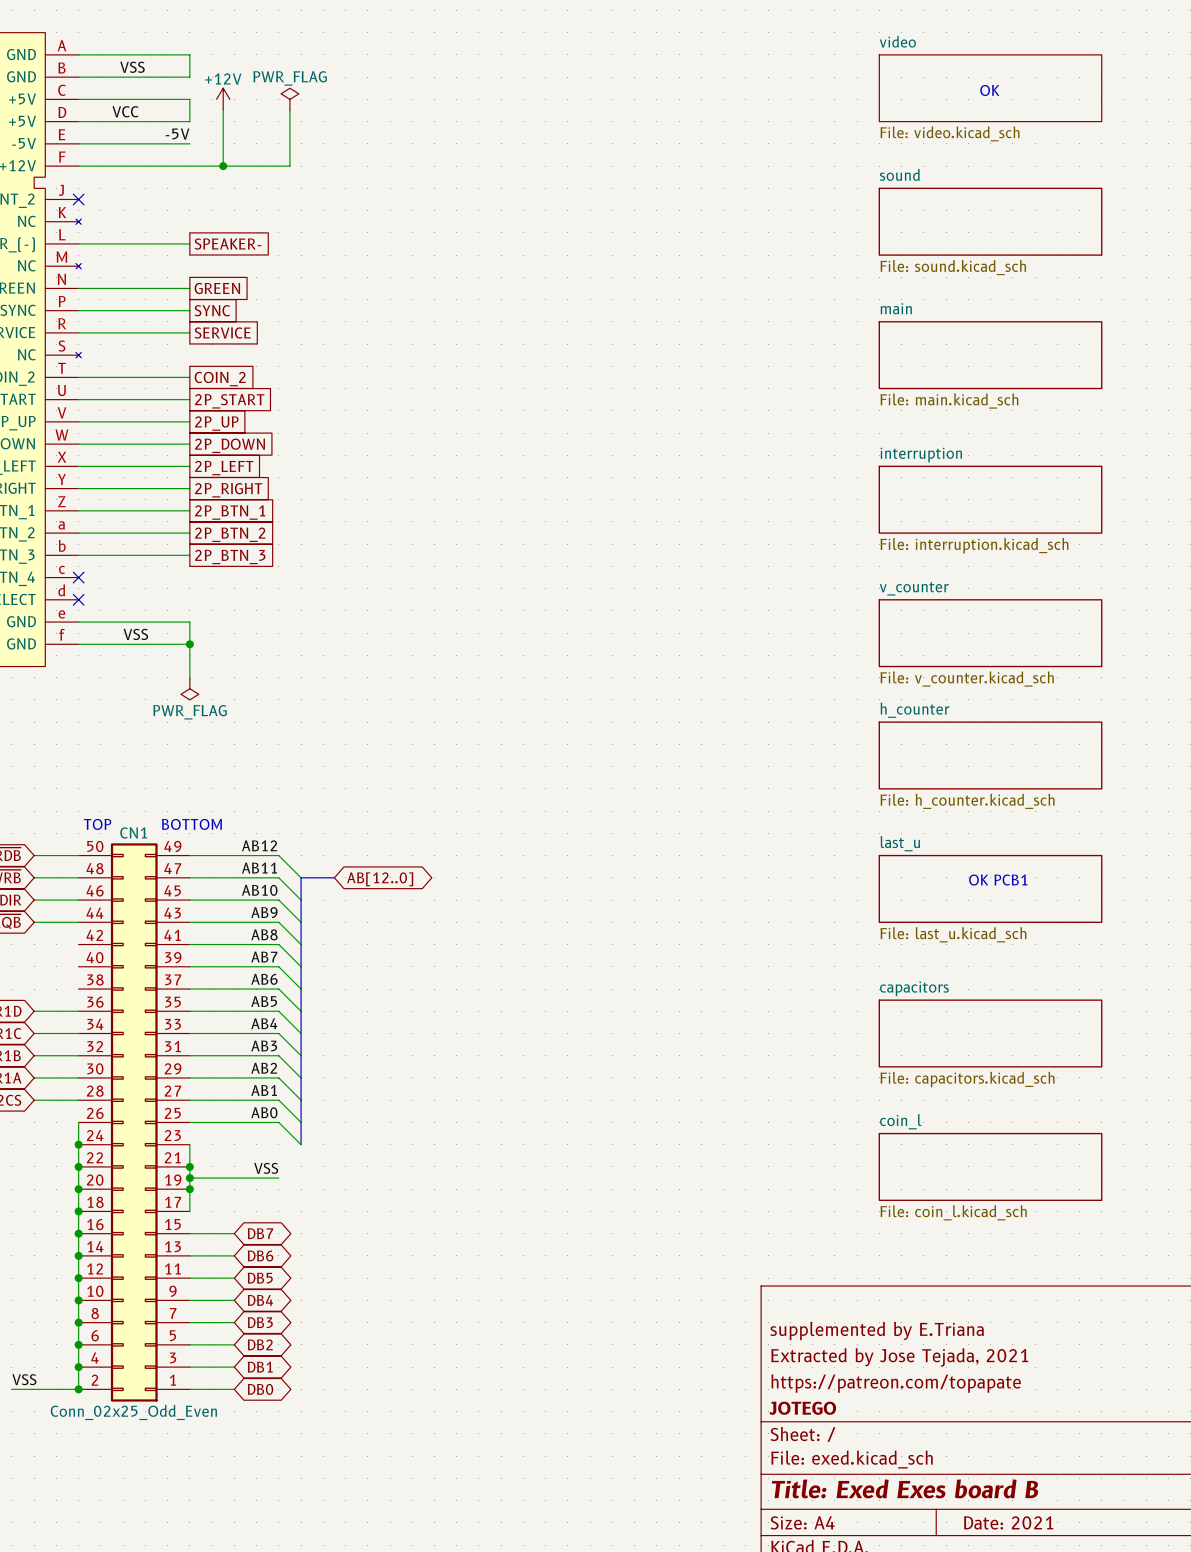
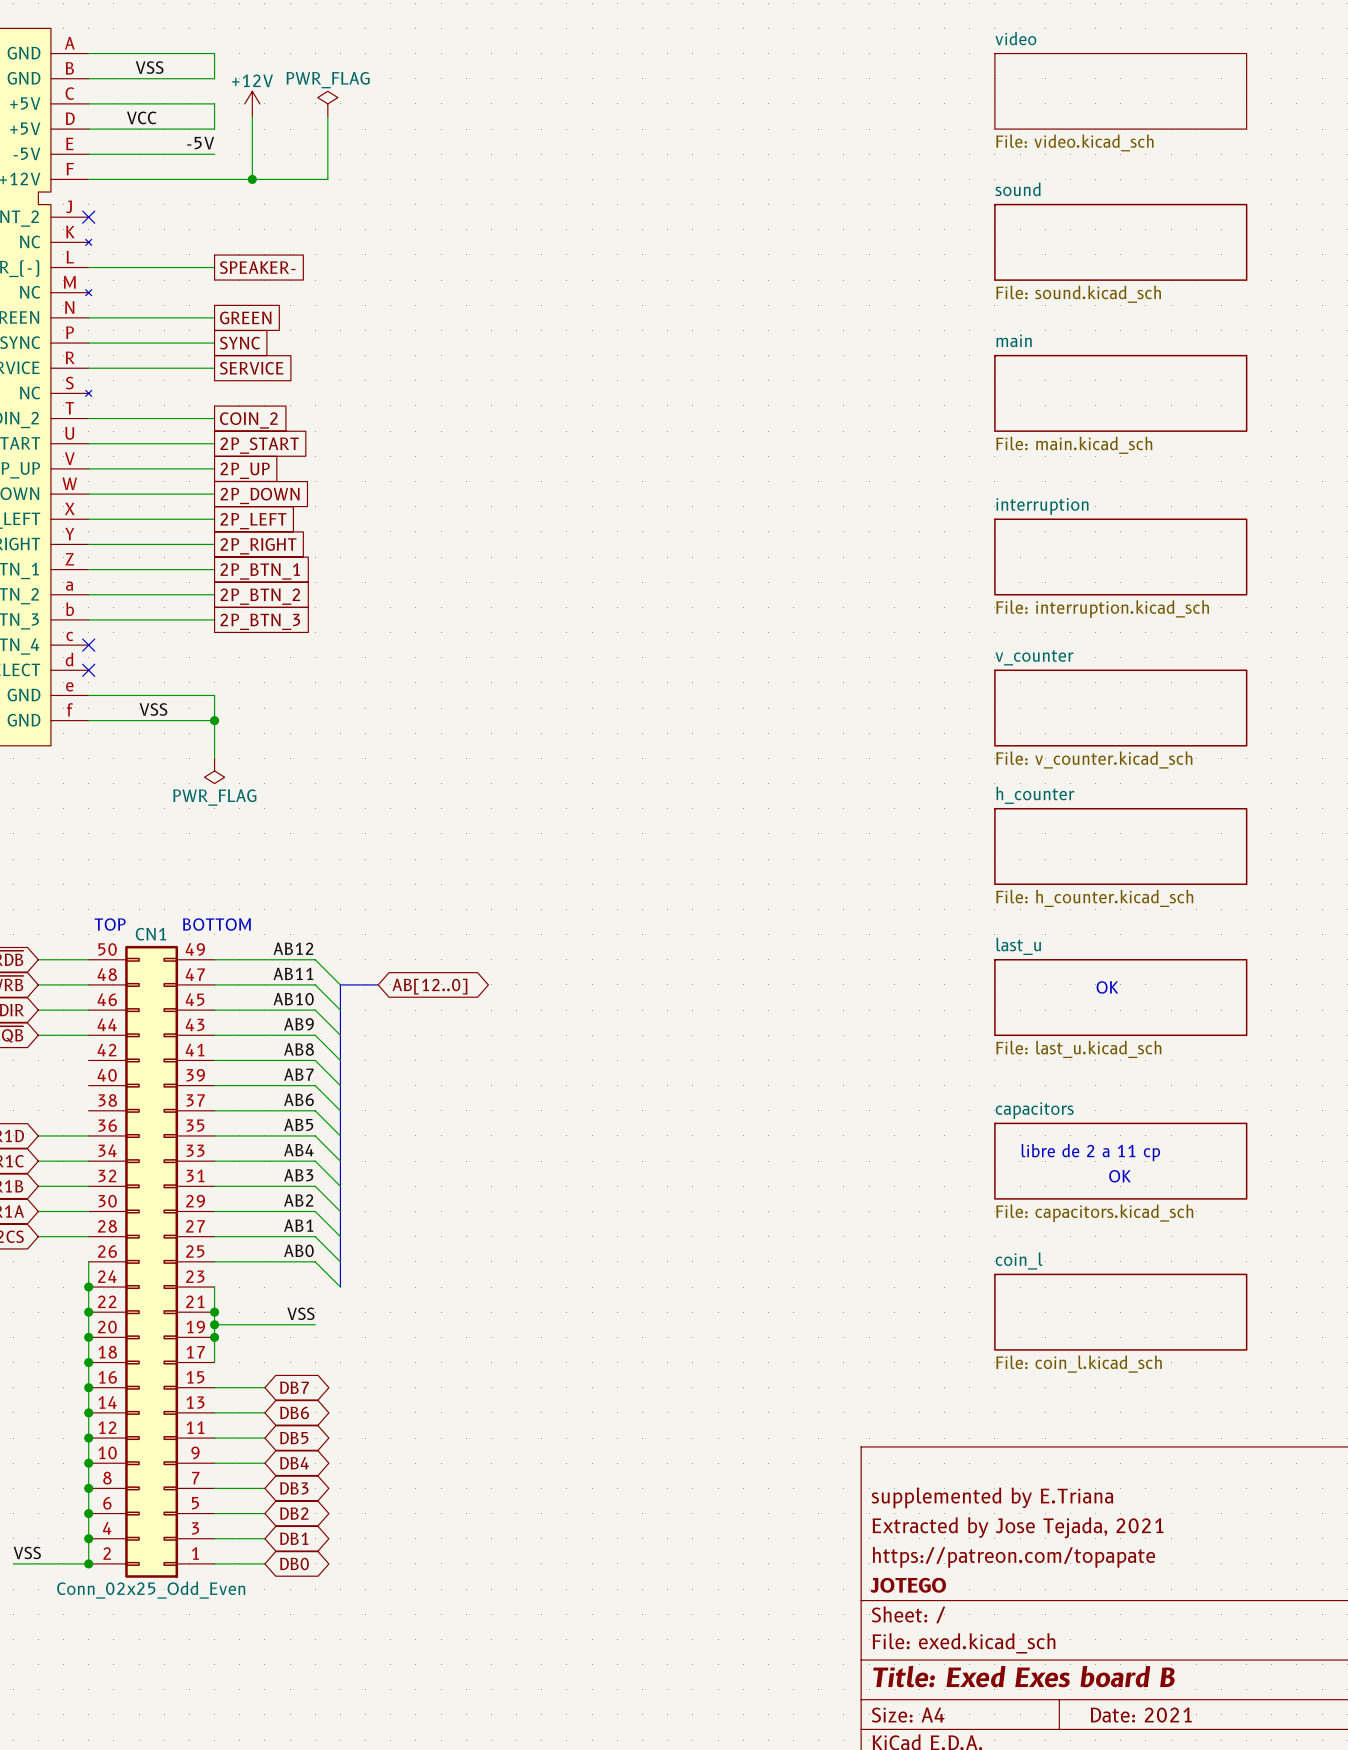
text: OK (989, 90) -> none
text: OK PCB1 (998, 880) -> OK (1107, 987)
text: none -> libre de 2 a 11 cp (1090, 1152)
text: none -> OK (1120, 1176)

